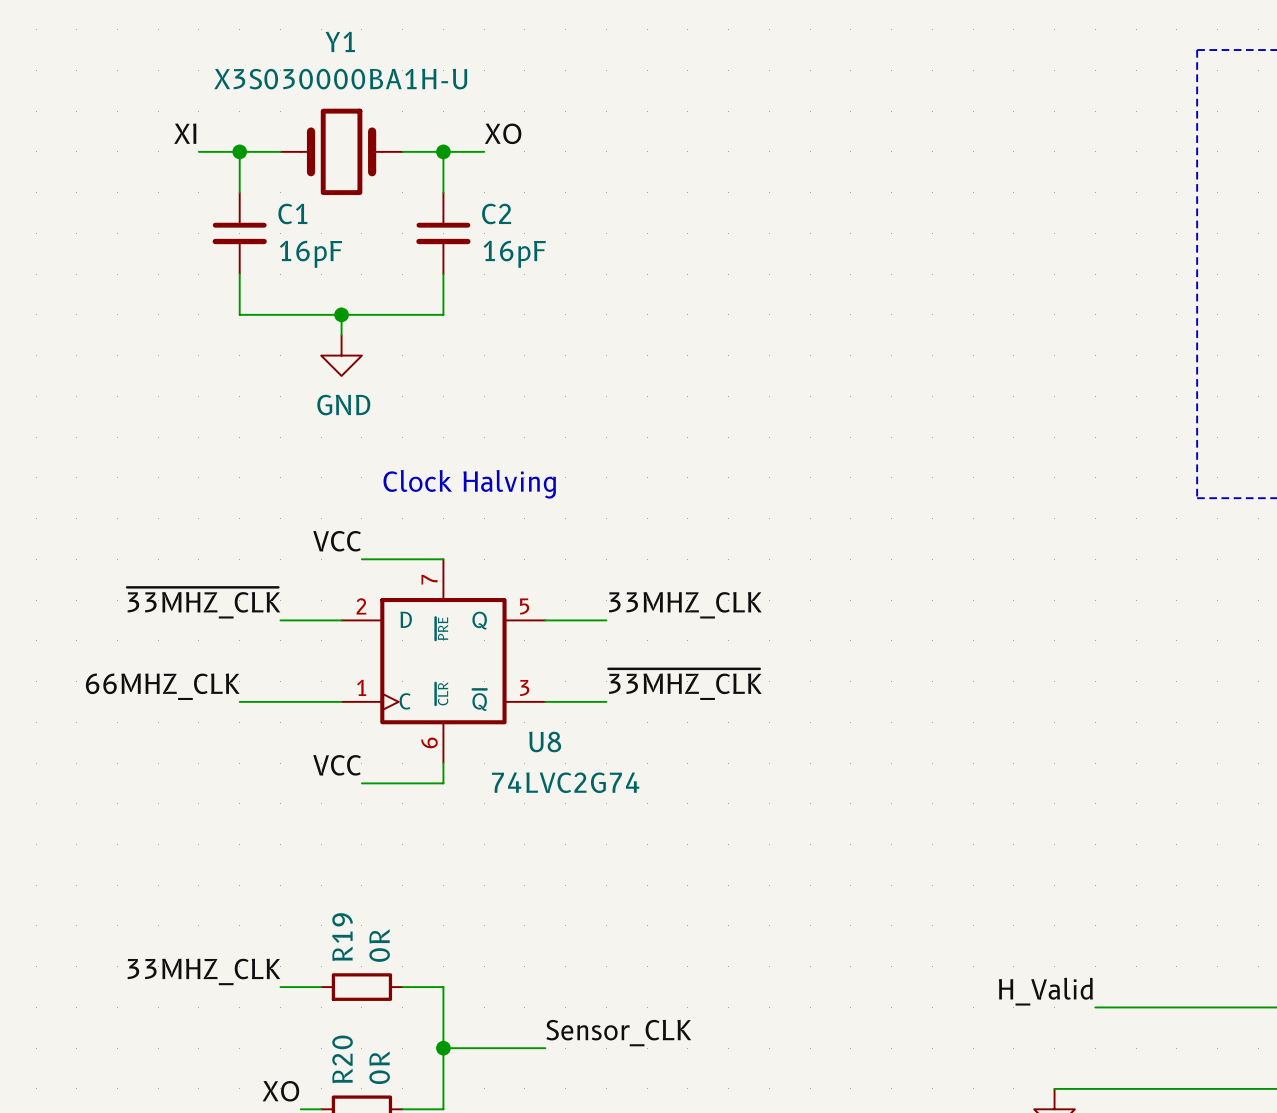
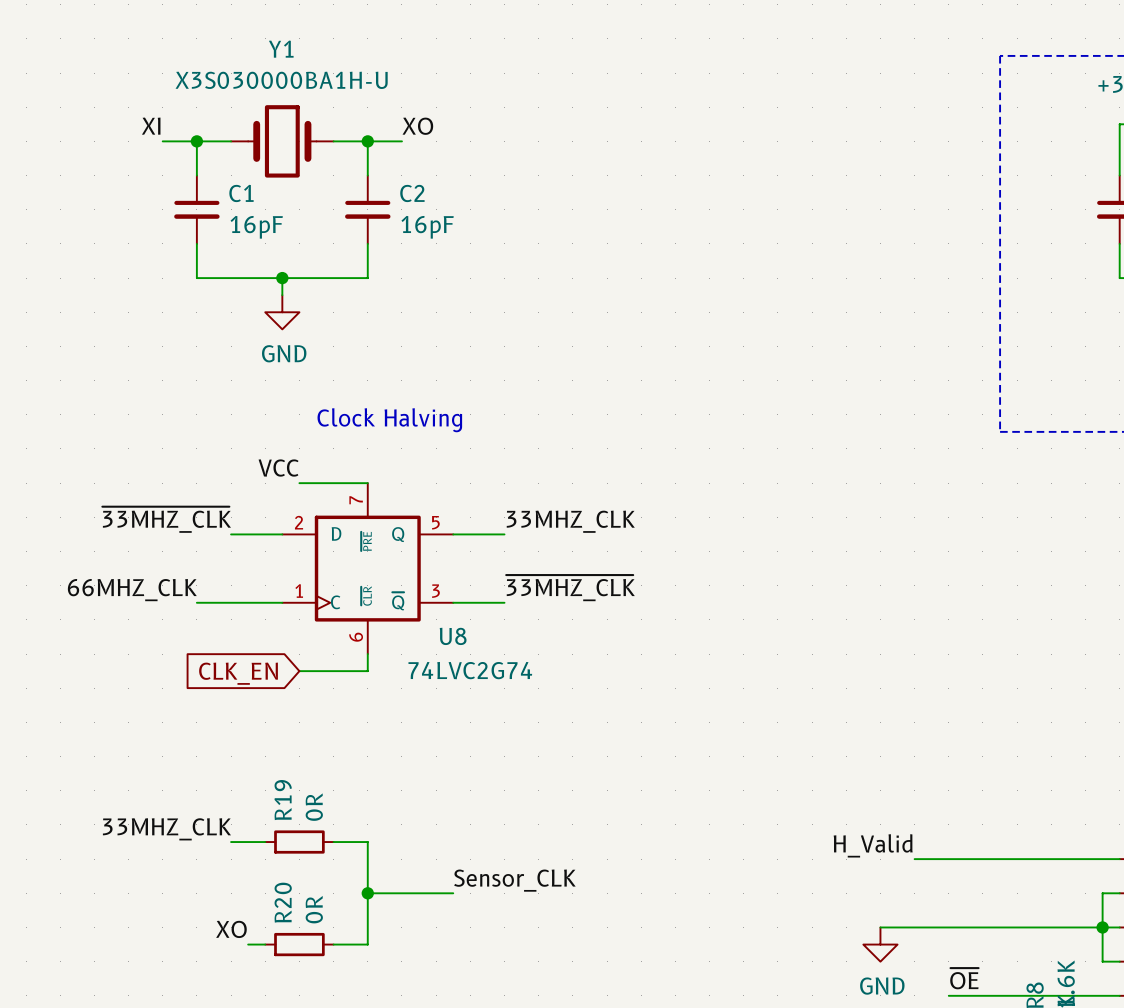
label: VCC (337, 765) -> none
global label: none -> CLK_EN (238, 673)

